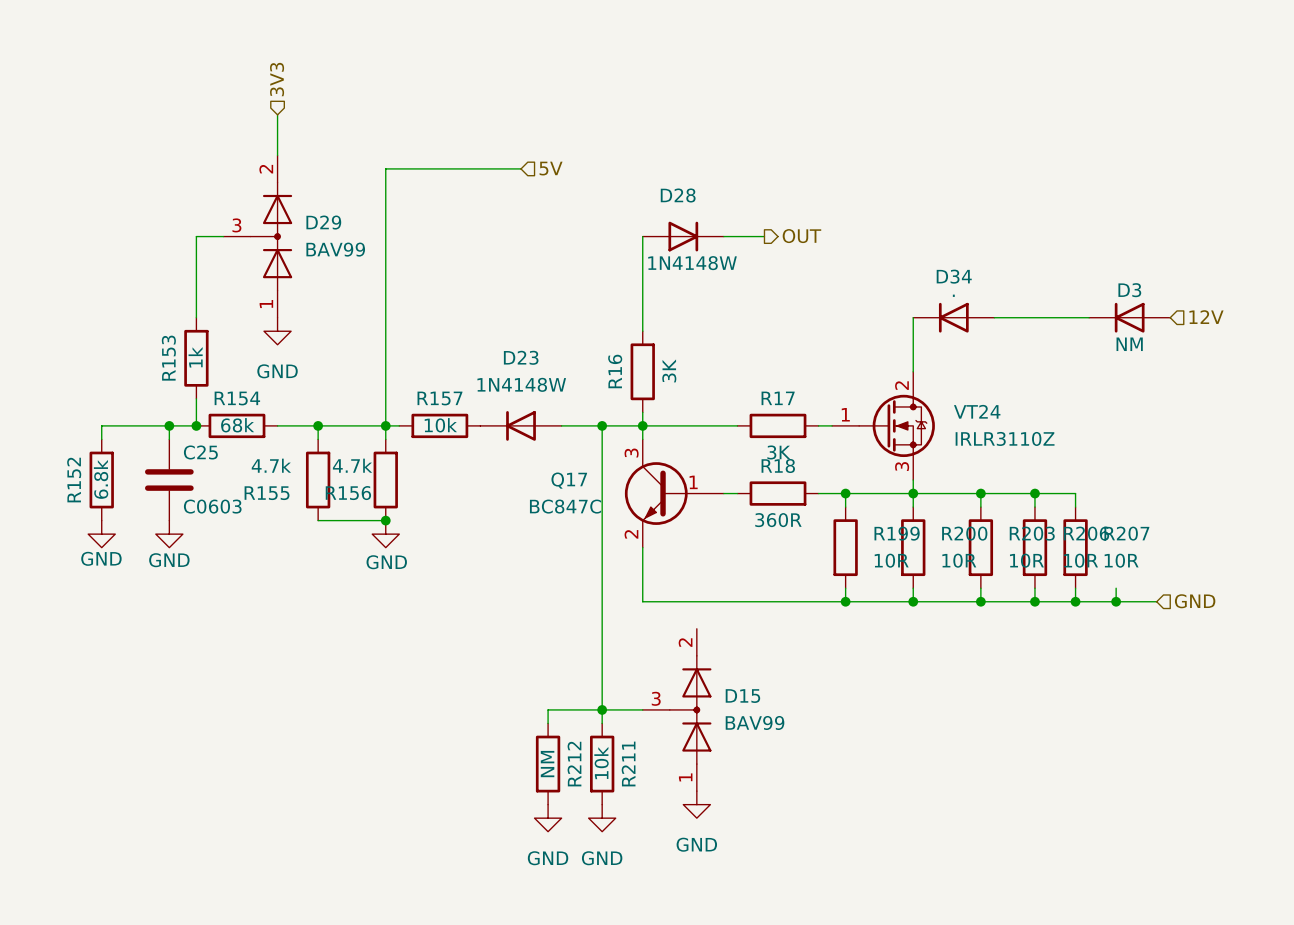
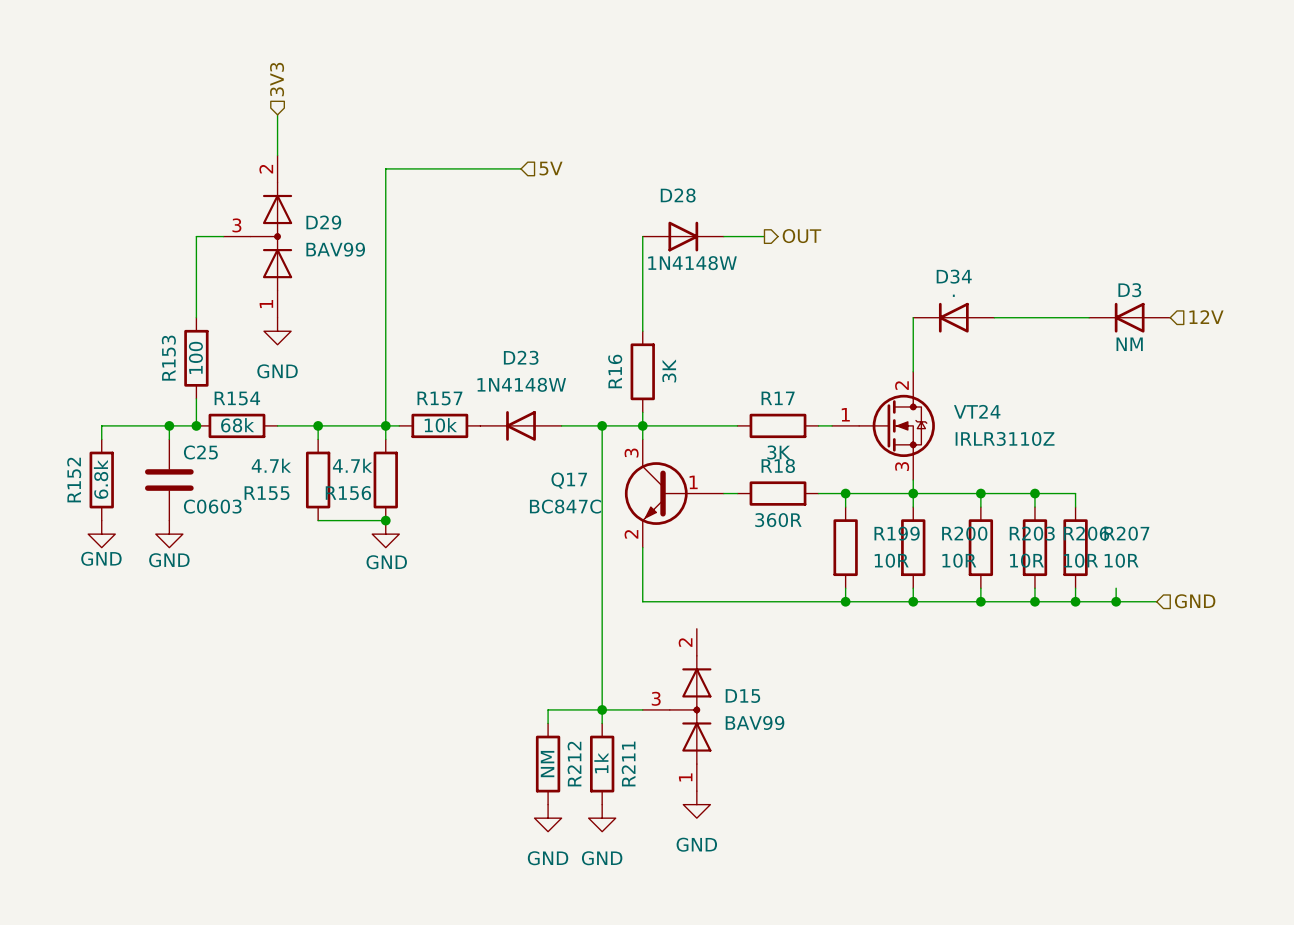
R153 value: 1k (195, 357) -> 100 (195, 357)
R211 value: 10k (601, 763) -> 1k (601, 763)

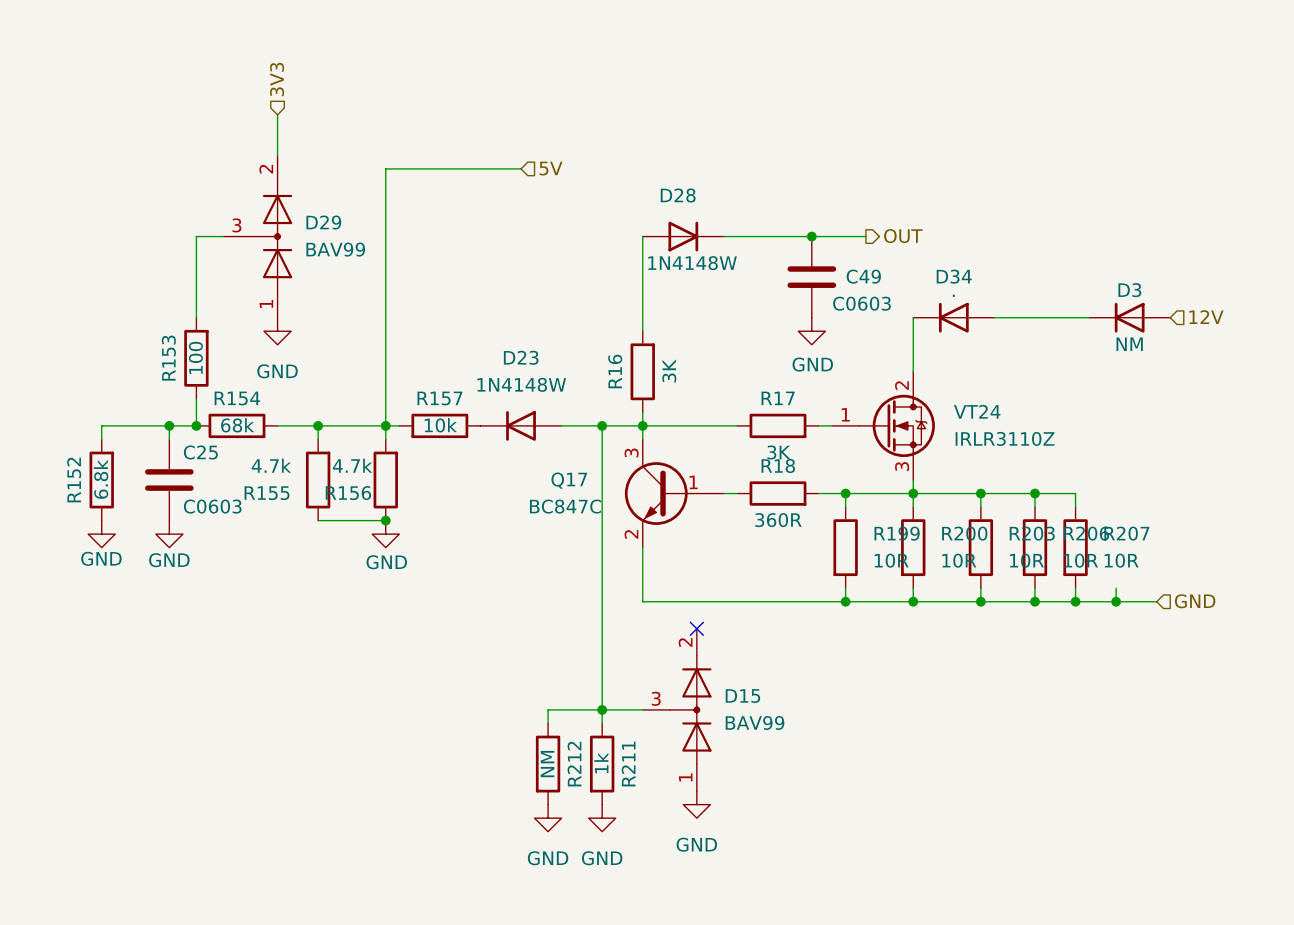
wire: none -> (764, 236) (865, 236)
hierarchical label position: OUT (801, 236) -> OUT (903, 236)
junction: none -> (811, 236)
C49: none -> C0603 (811, 277)
power symbol: none -> GND (811, 331)
no-connect mark: none -> (696, 628)

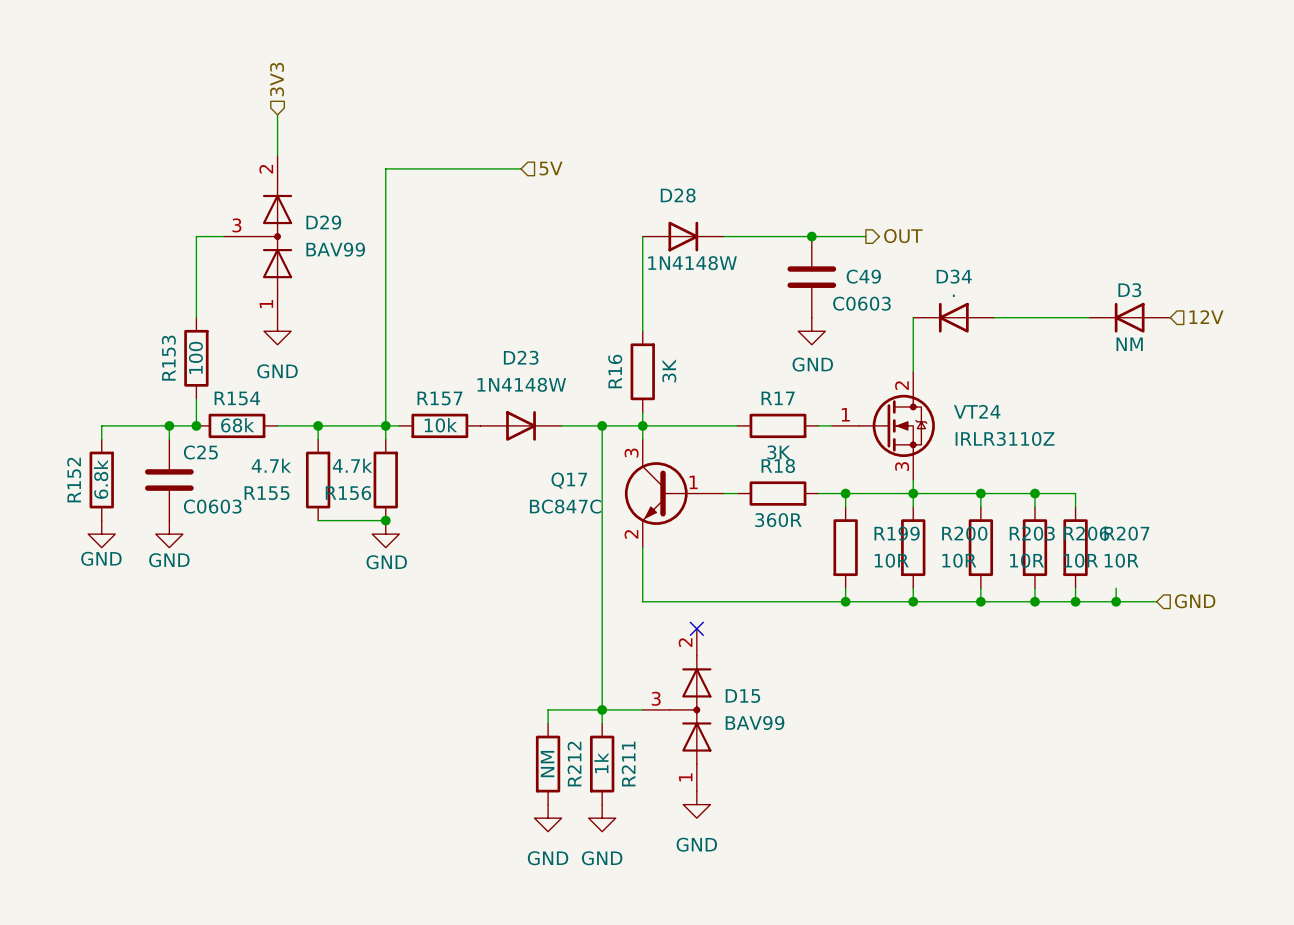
D23 rotation: 0° (521, 425) -> 180° (521, 425)

